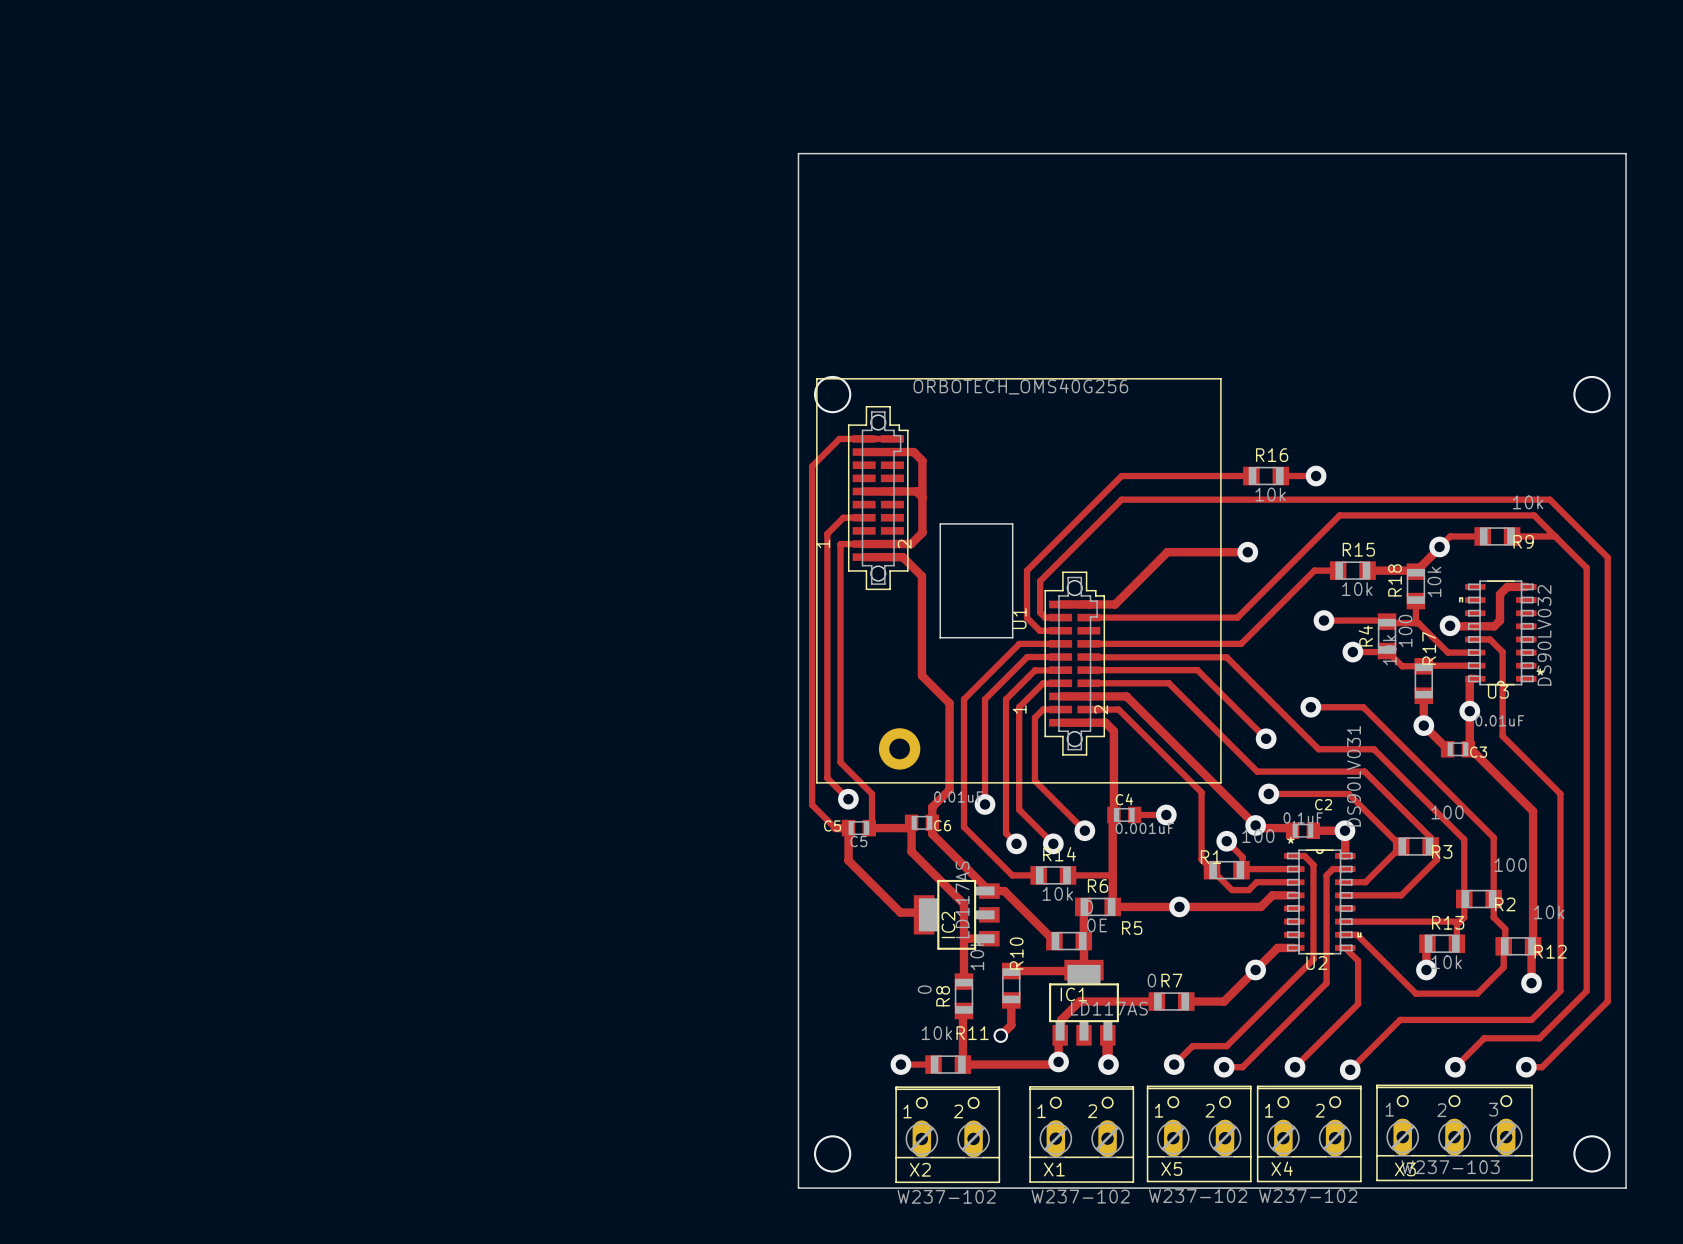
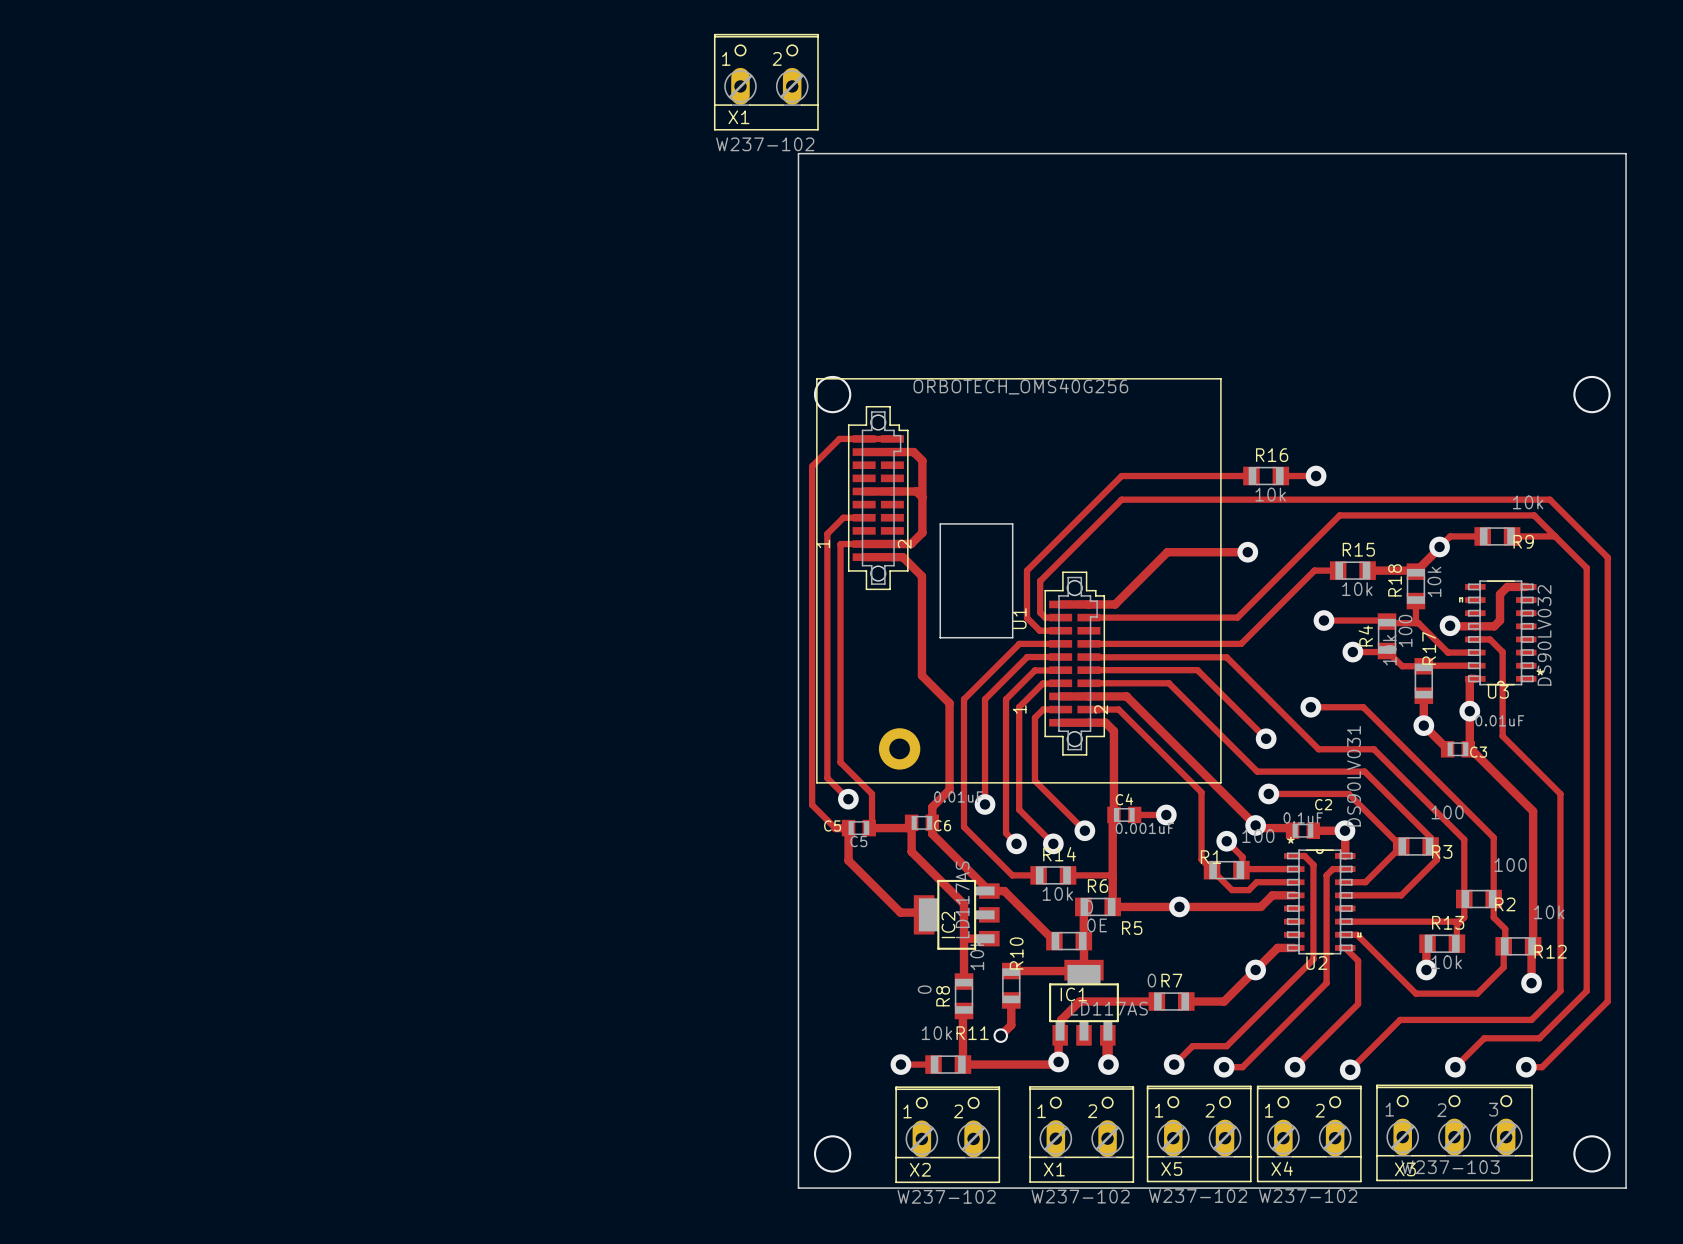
X1: none -> W237-102 (766, 82)

